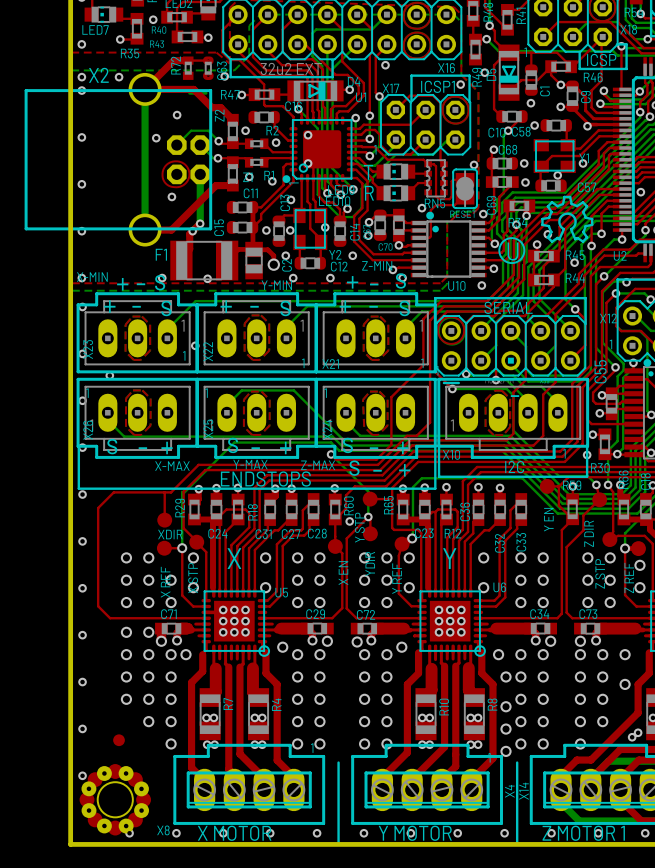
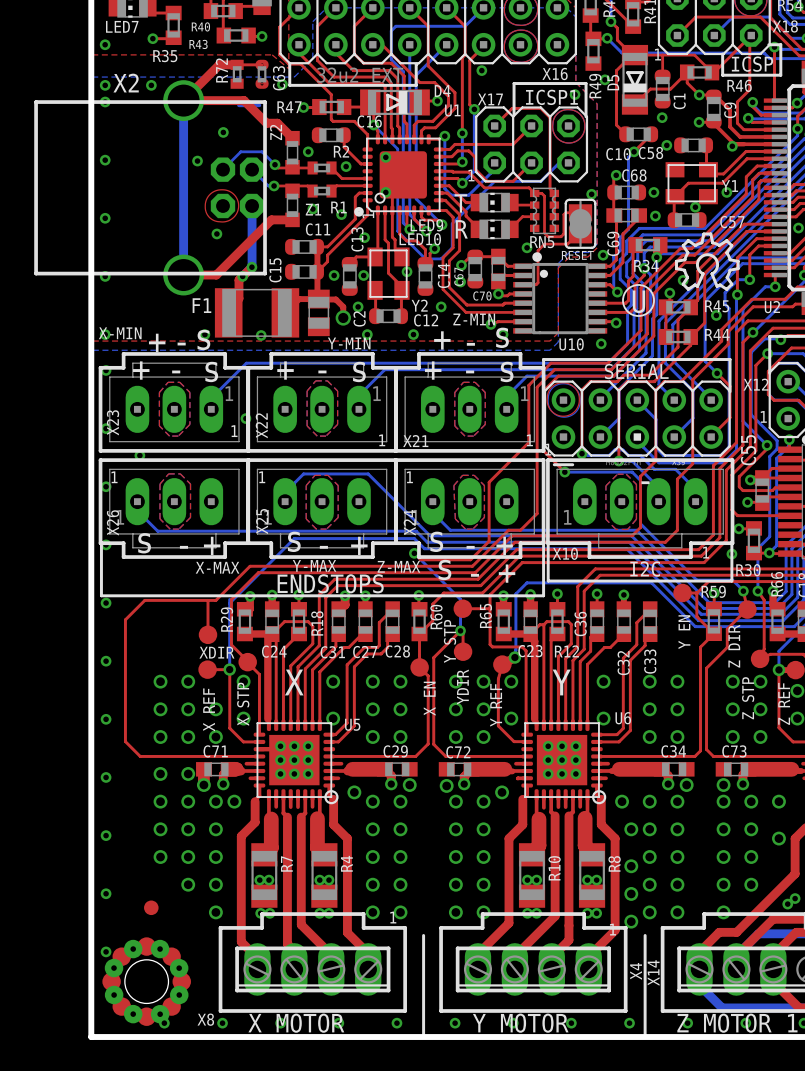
via: (153, 19) -> none
via: (349, 521) -> none

